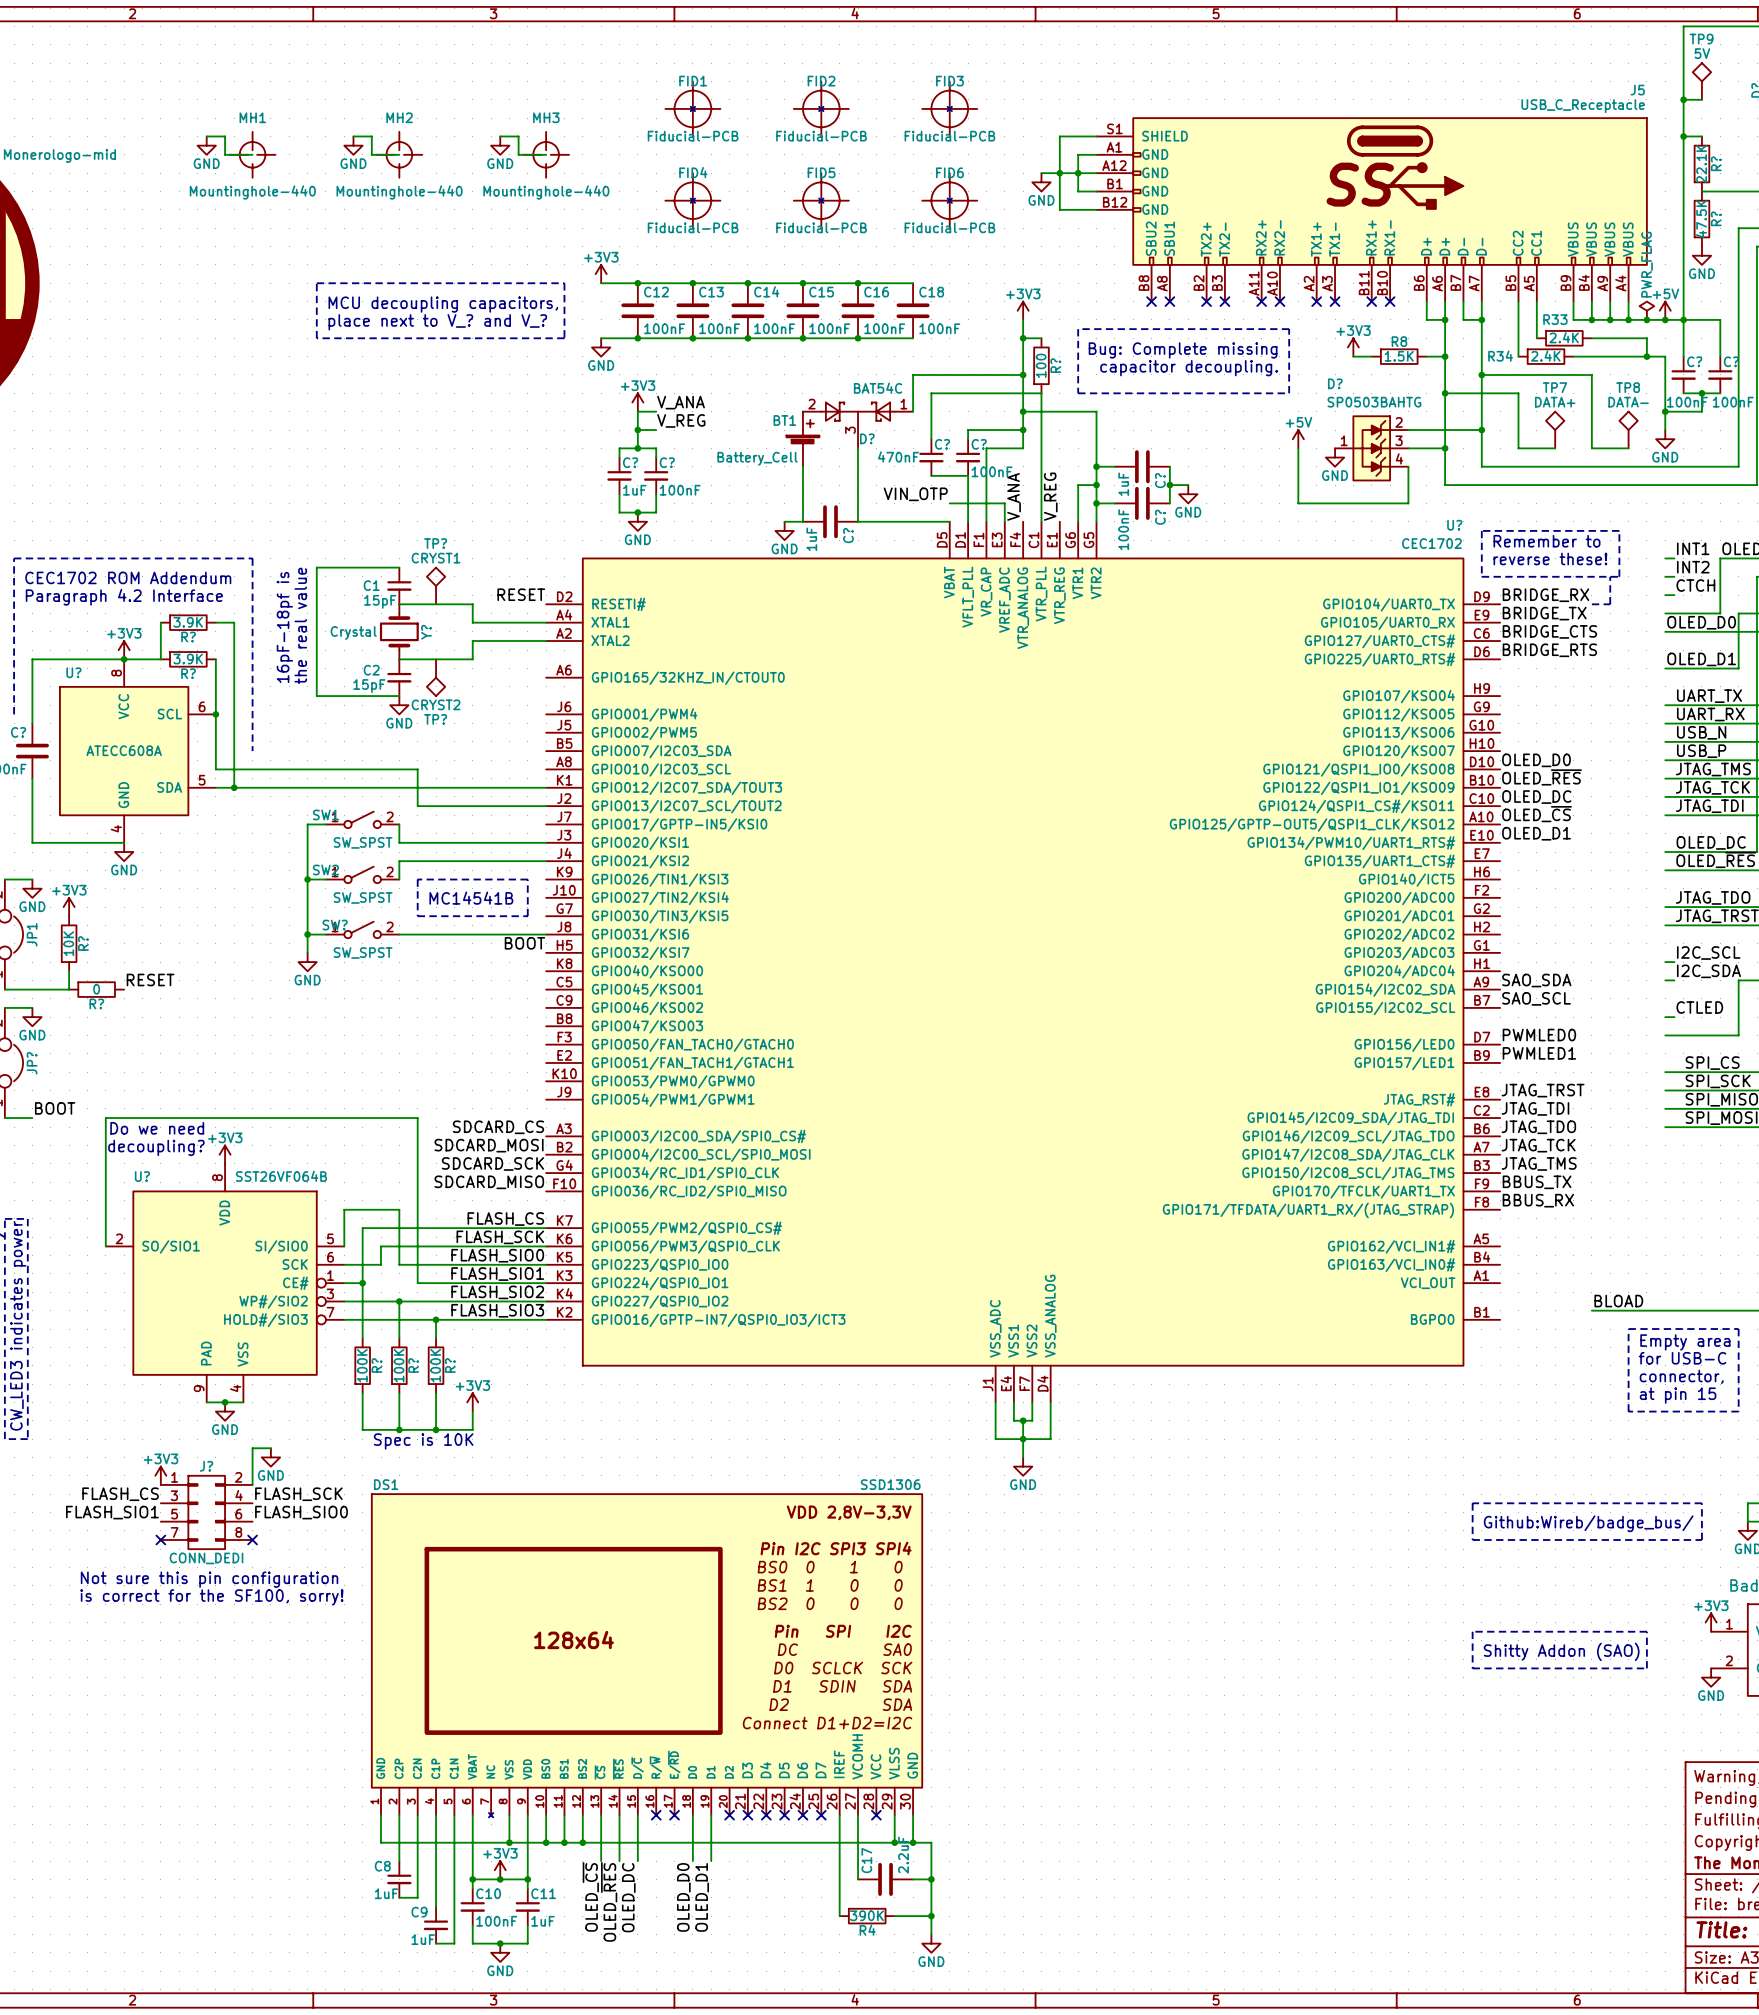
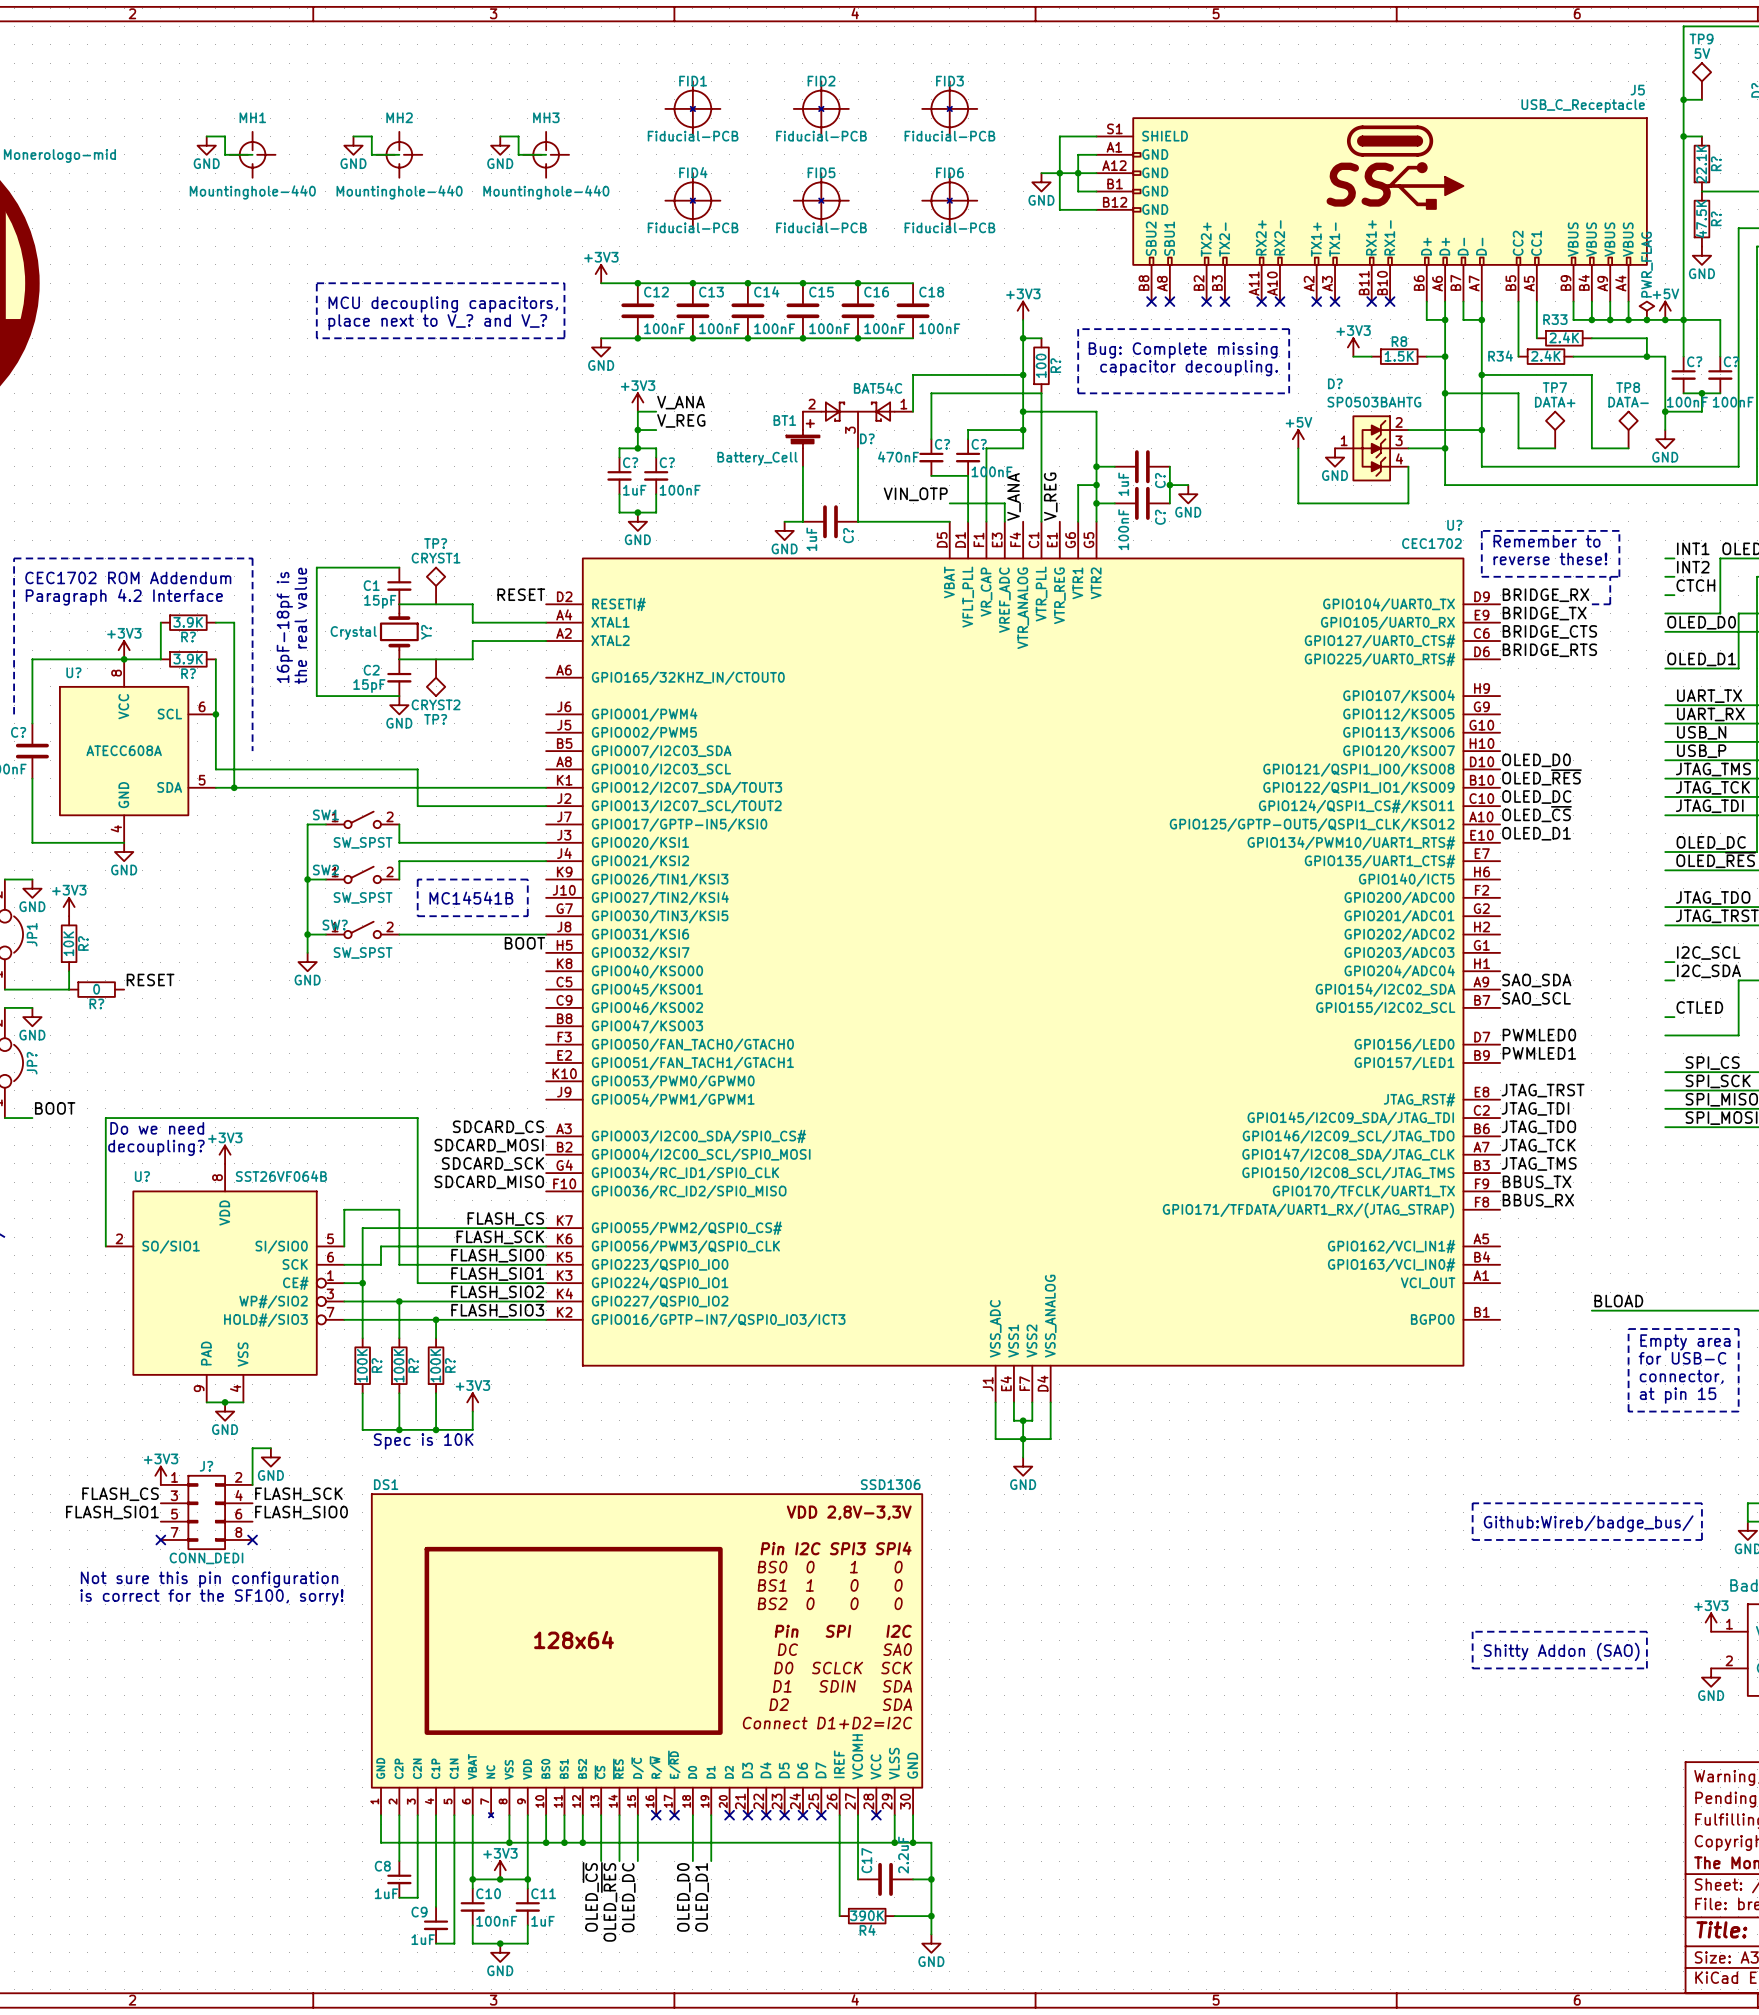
line: (4, 1218) (4, 1439) (27, 1439) (27, 1218) (4, 1218) -> none
text: CW_LED3 indicates power (18, 1325) -> none

